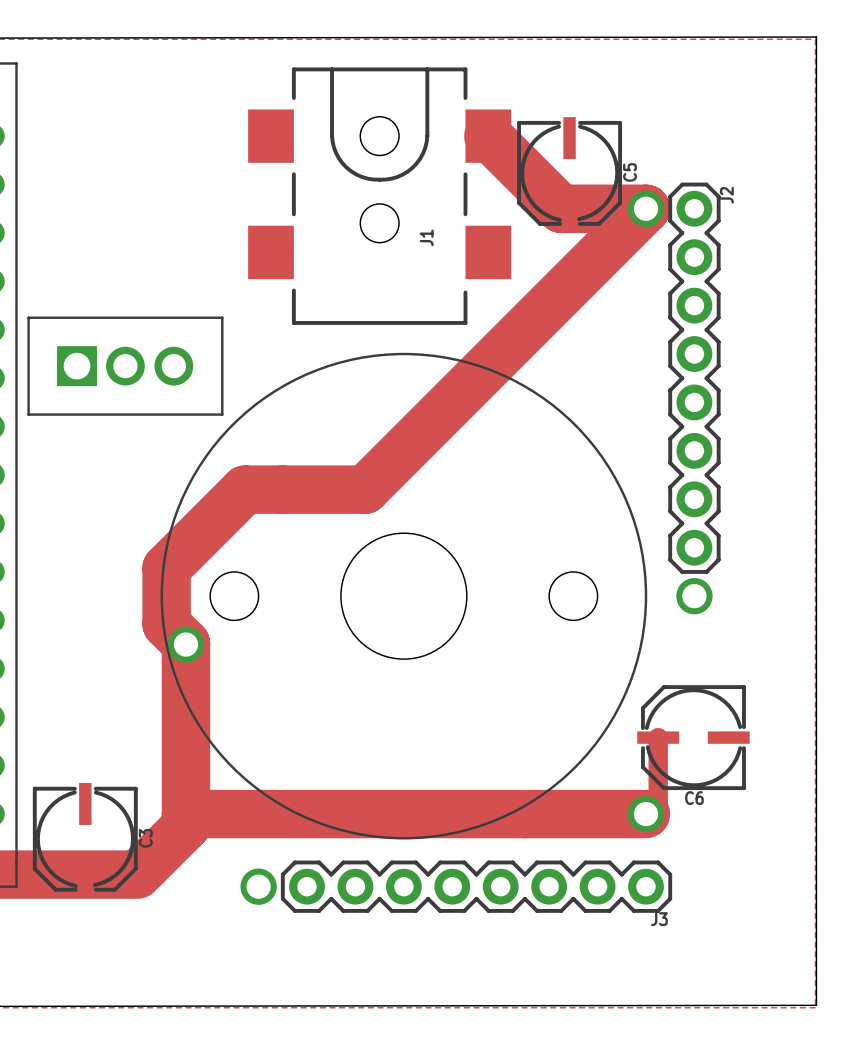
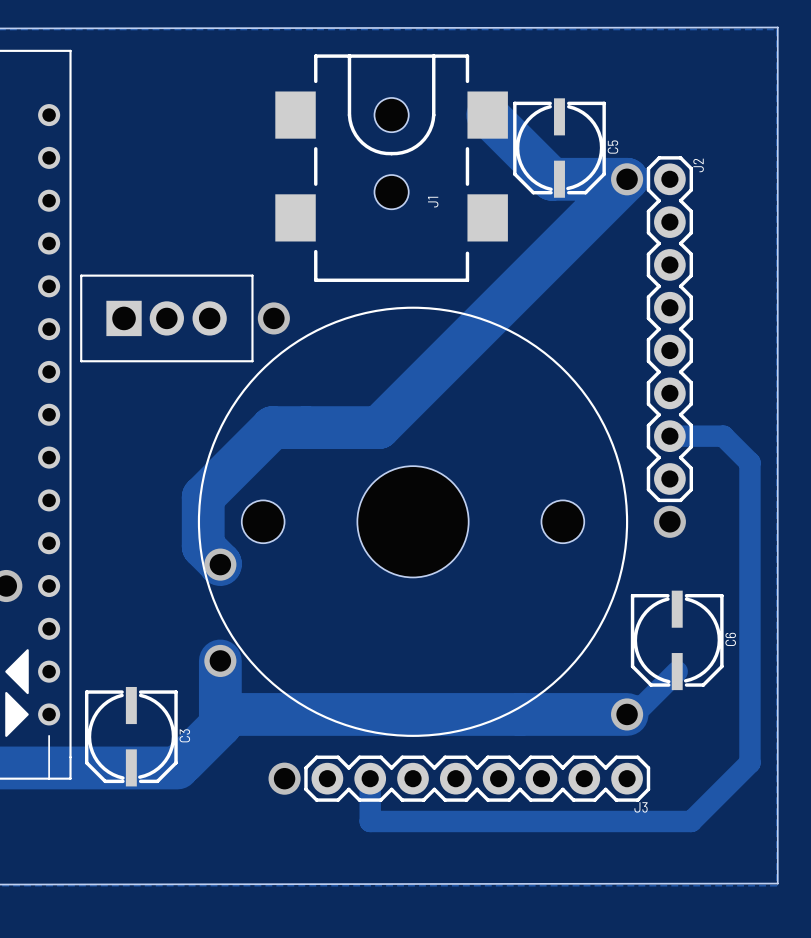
via: none -> (273, 318)
track: none -> (669, 436) (723, 436) (749, 462) (749, 762) (691, 821) (370, 821) (370, 778)
track: (185, 644) (185, 753) -> none
track: (658, 737) (658, 801) -> none
C6 rotation: 0° (693, 737) -> 90° counterclockwise (677, 640)
via: none -> (220, 660)
track: none -> (677, 671) (634, 714) (627, 714)

